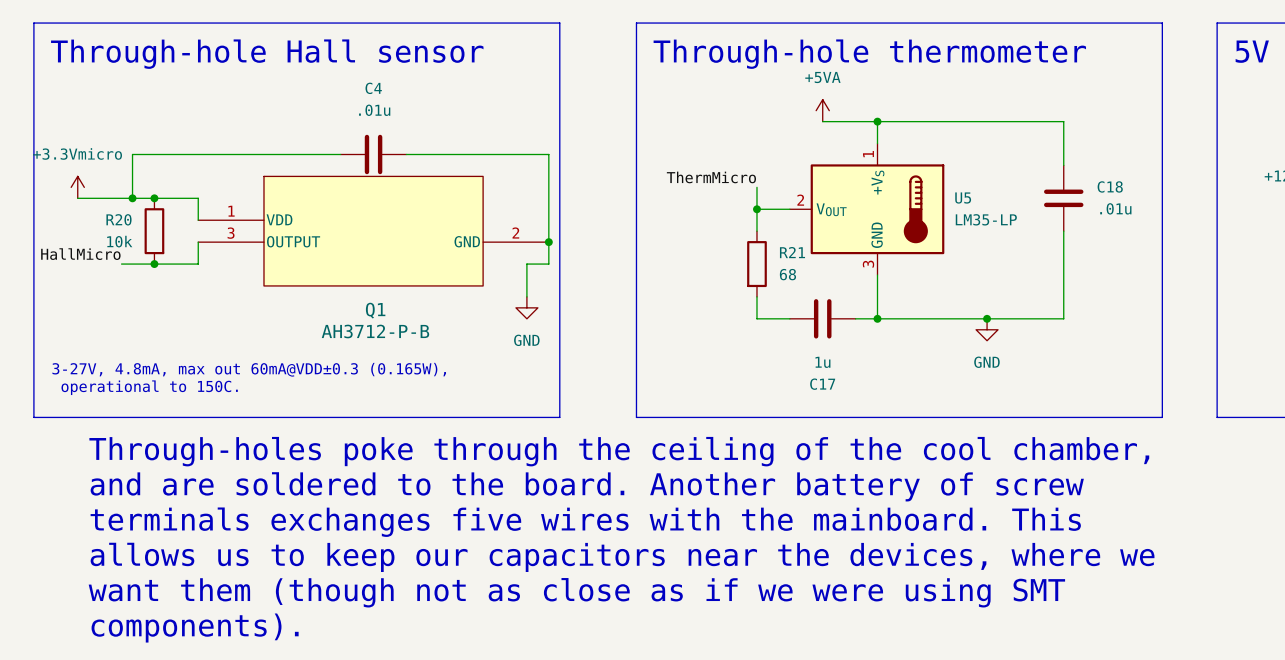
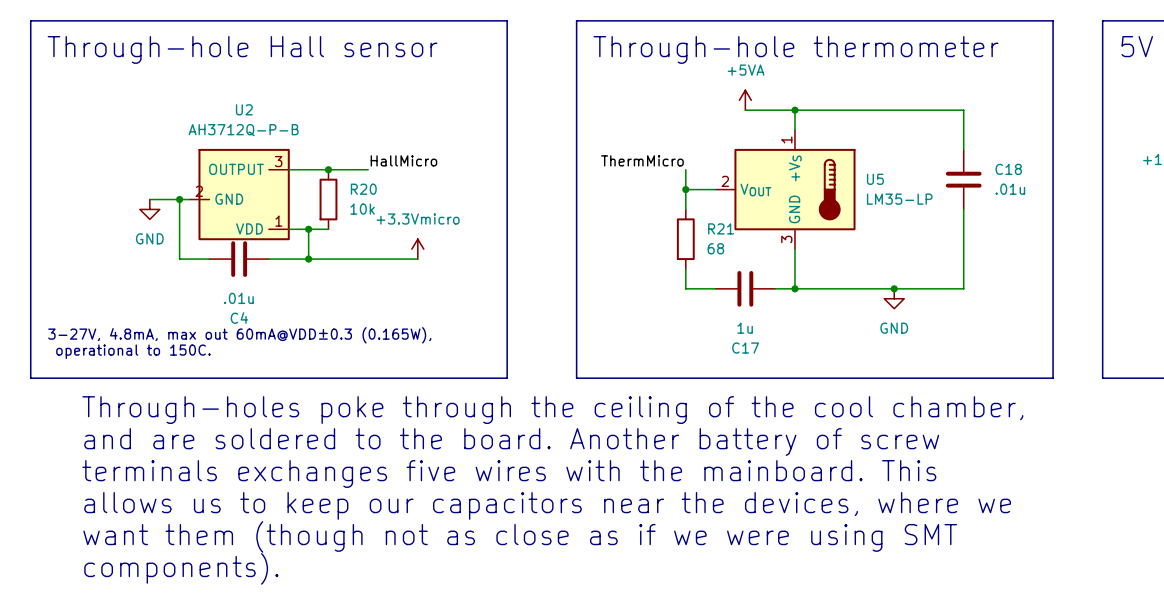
C4 name position: C4 (373, 88) -> C4 (239, 318)
C4 value position: .01u (374, 110) -> .01u (238, 298)
wire: (340, 154) (132, 154) (132, 198) -> none
C4 position: (373, 154) -> (239, 259)
wire: (406, 154) (548, 154) (548, 264) (526, 264) (526, 296) -> none
label: none -> HallMicro (403, 160)
power symbol: +3.3Vmicro (77, 187) -> none
junction: none -> (328, 169)
wire: (77, 198) (198, 198) (198, 220) -> (179, 219) (179, 199)
junction: (132, 198) -> none
junction: (154, 198) -> none
U2: none -> AH3712Q-P-B (239, 194)
R20 name position: R20 (118, 219) -> R20 (363, 189)
wire: none -> (149, 199) (189, 199)
junction: none -> (179, 199)
R20 position: (154, 231) -> (328, 199)
power symbol: none -> GND (149, 209)
Q1: AH3712-P-B (373, 231) -> none
R20 value position: 10k (119, 241) -> 10k (362, 209)
junction: (548, 242) -> none
junction: none -> (308, 229)
label: HallMicro (80, 254) -> none
wire: (121, 264) (198, 264) -> (209, 259) (179, 259) (179, 239)
junction: (154, 264) -> none
power symbol: none -> +3.3Vmicro (417, 249)
junction: none -> (308, 259)
power symbol: GND (526, 307) -> none

